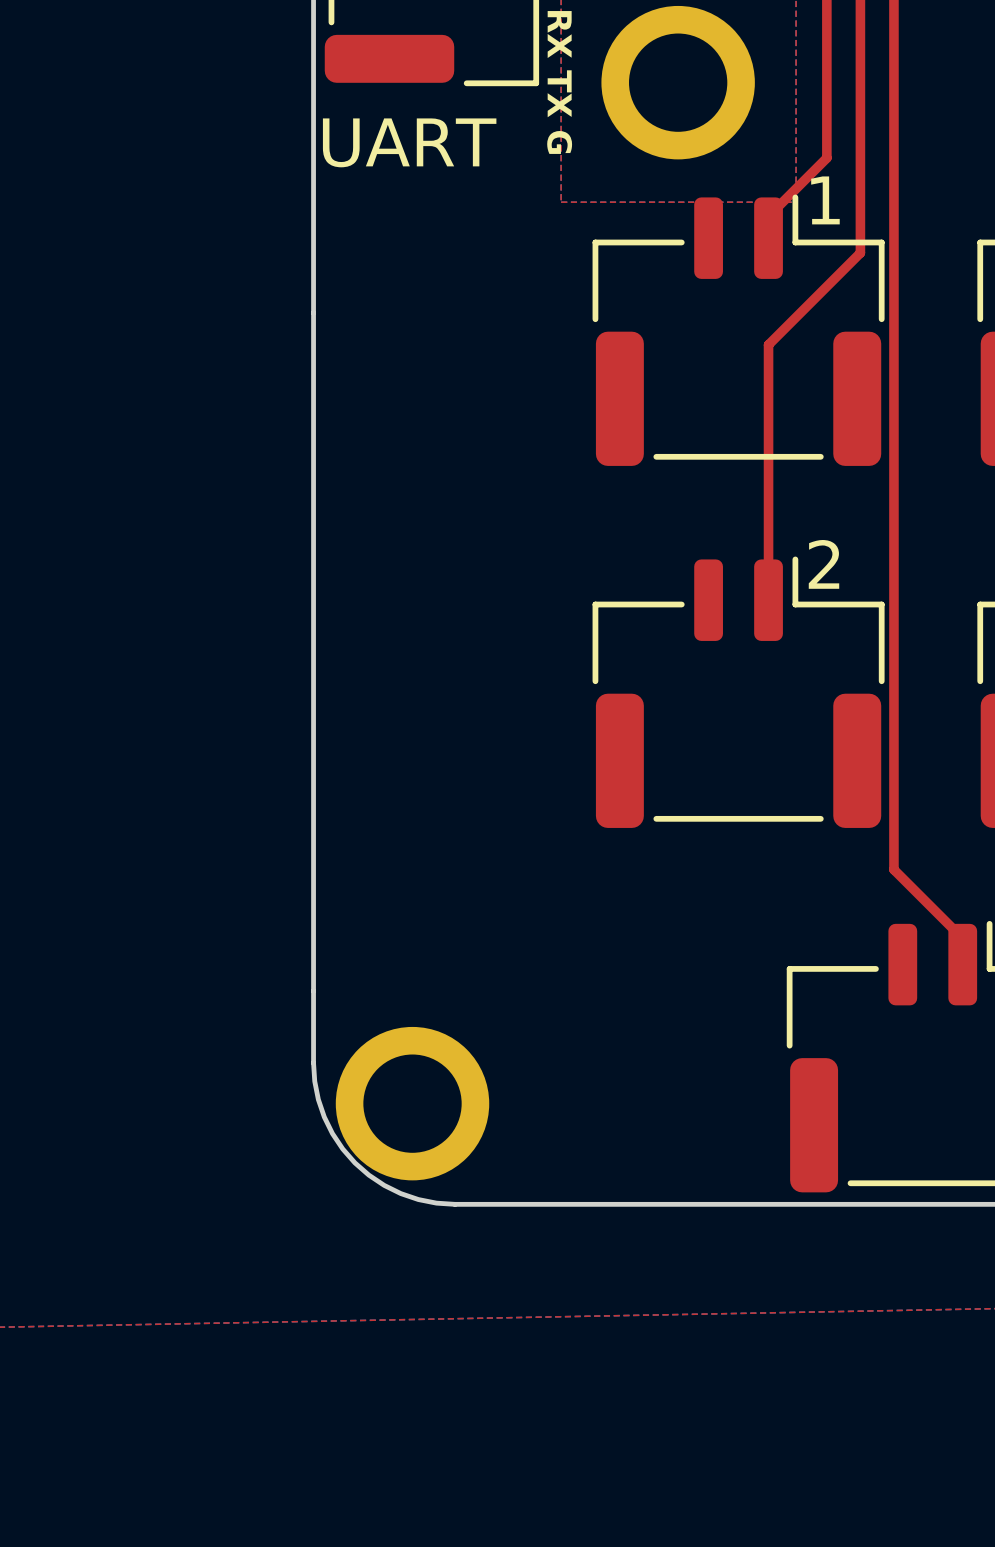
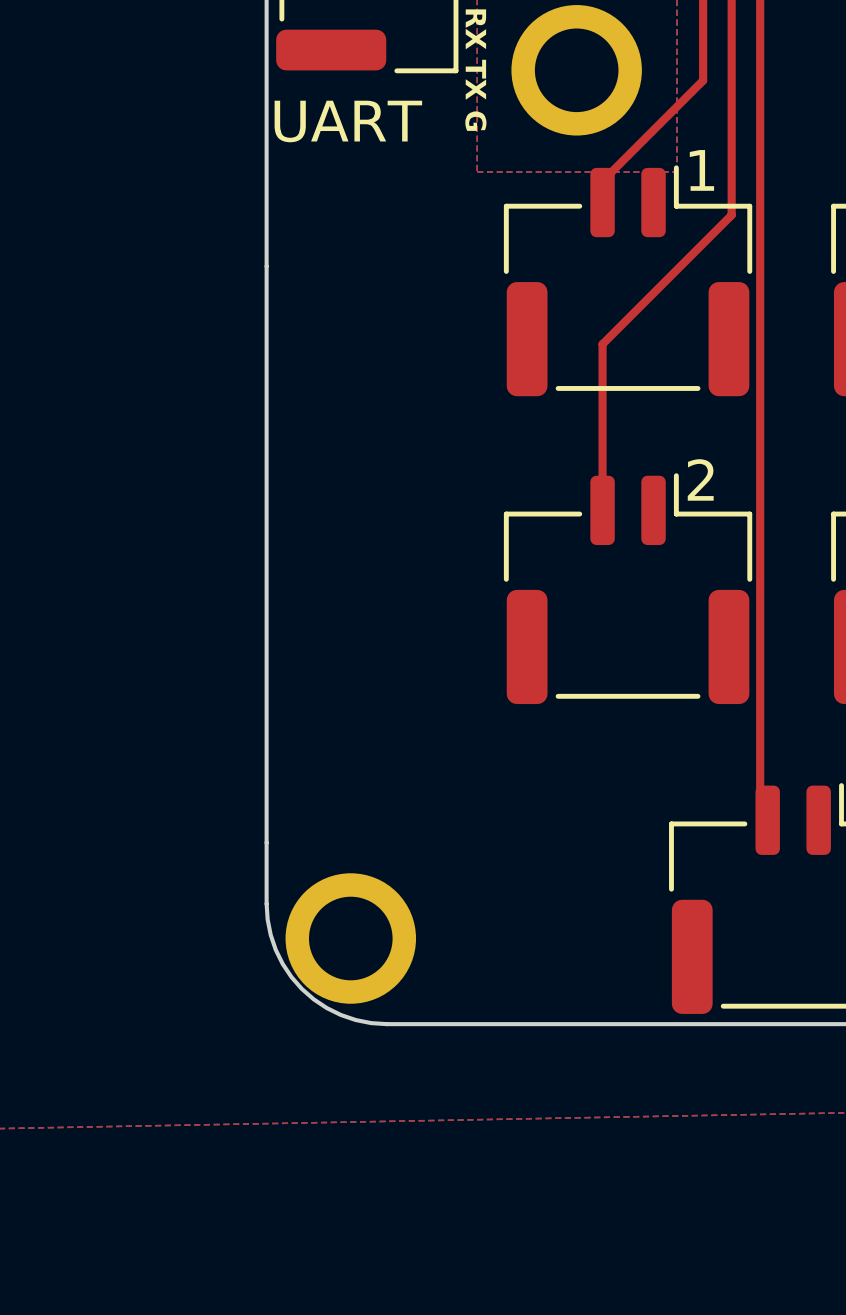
top track: (826, 94) (826, 158) (768, 216) (768, 238) -> (703, 80) (602, 181) (602, 202)
top track: (768, 344) (768, 600) -> (653, 293) (602, 344) (602, 510)
top track: (893, 869) (962, 938) (962, 964) -> (760, 739) (760, 812) (767, 820)

